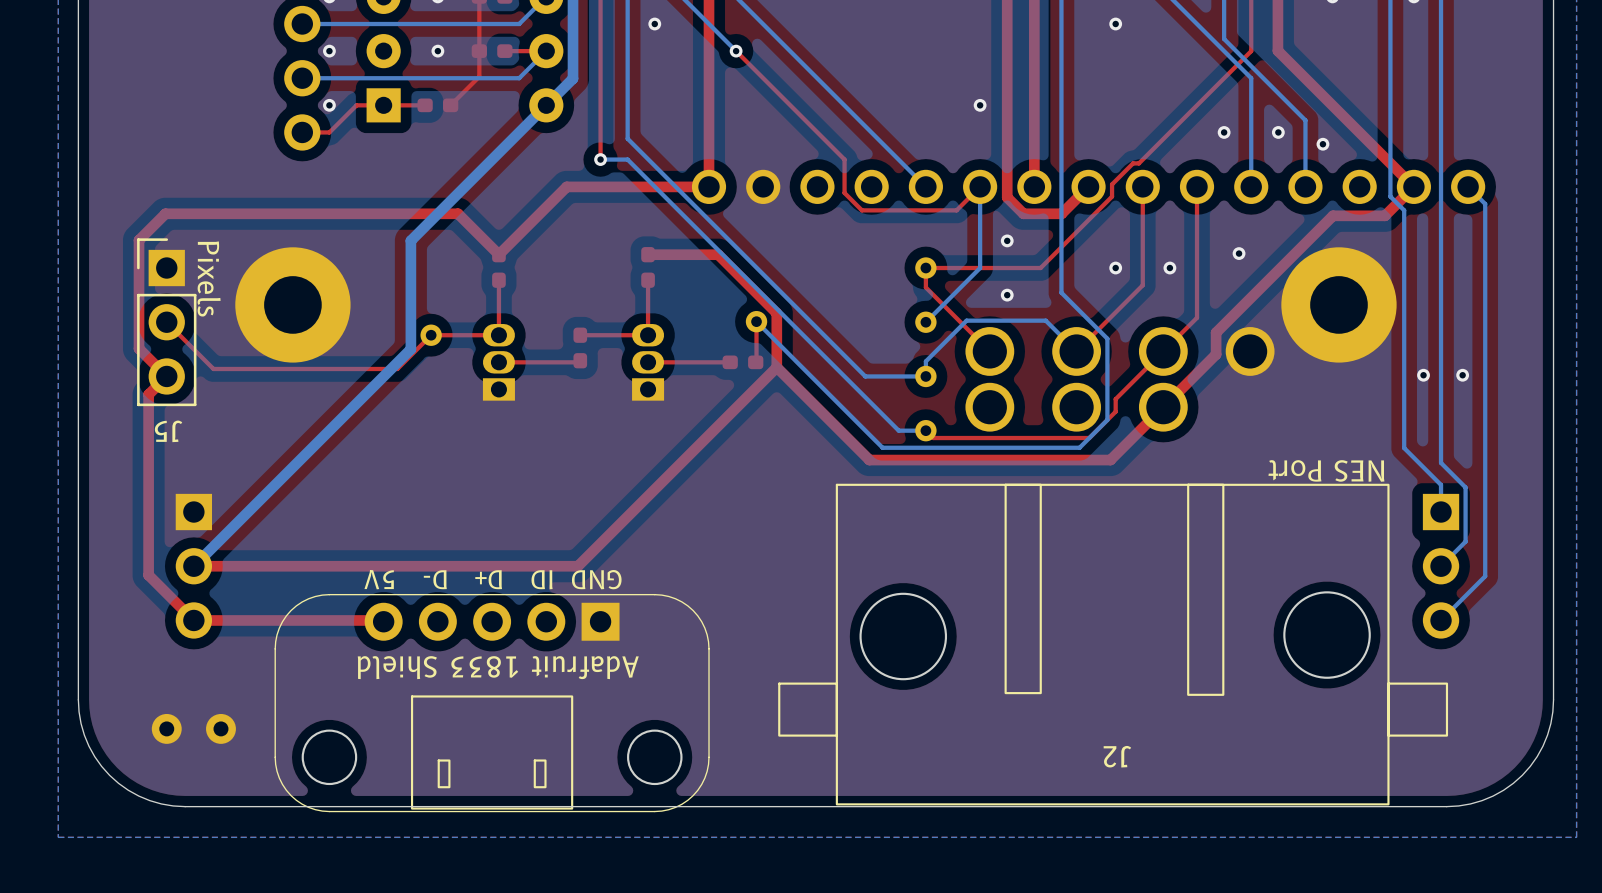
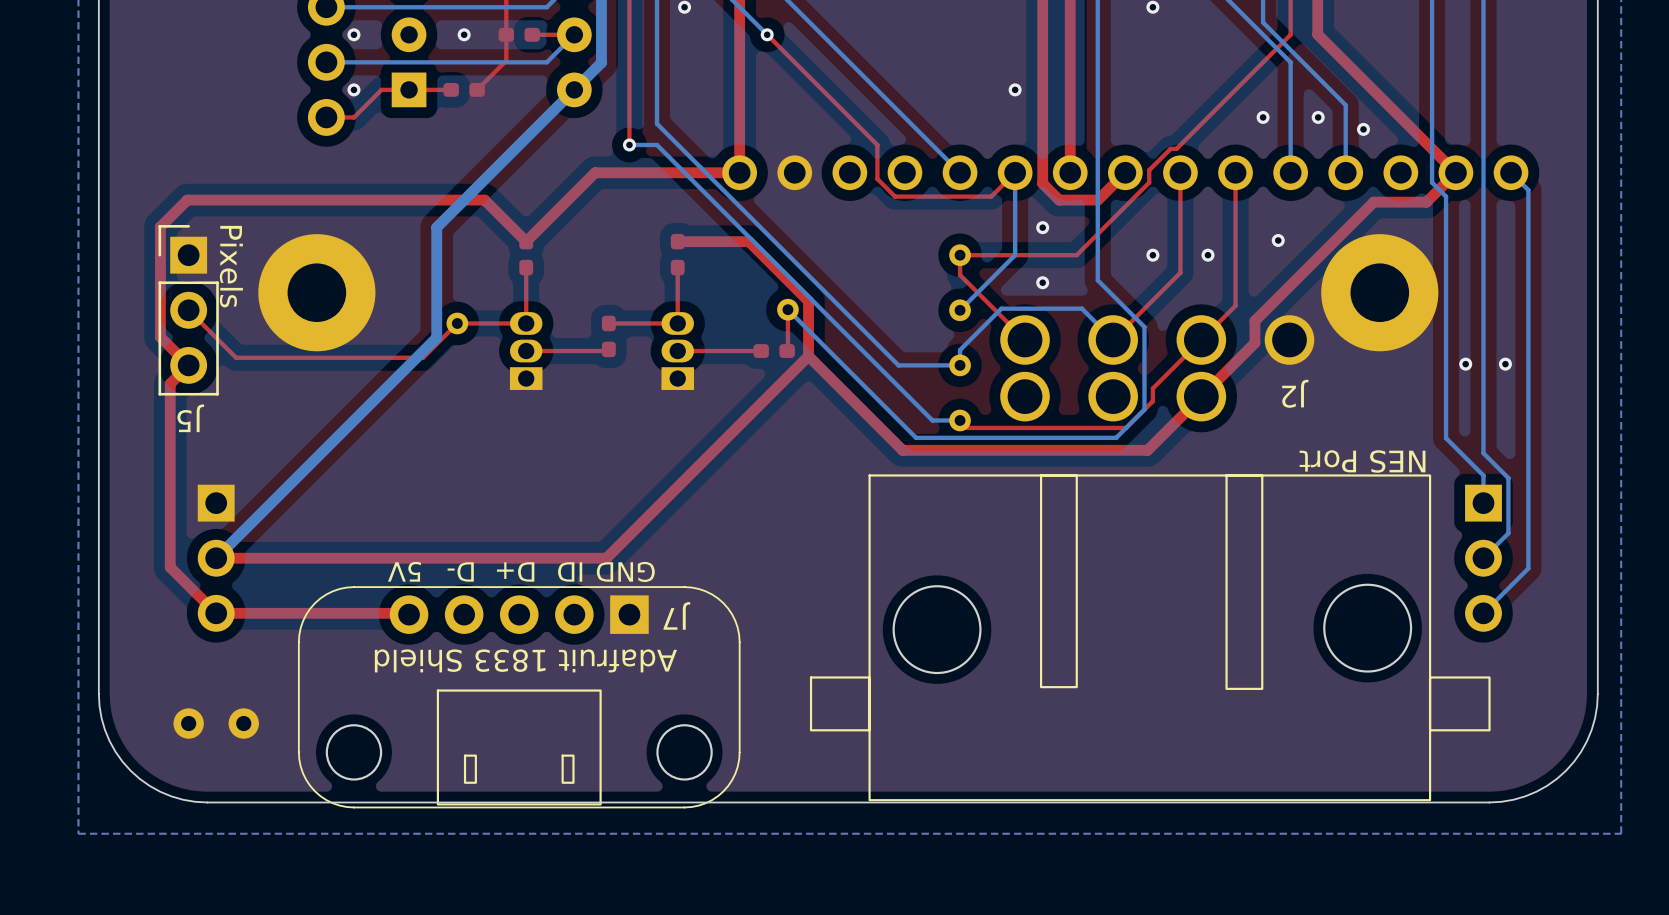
J7 name: none -> J7 (676, 615)
J2 name position: J2 (1117, 756) -> J2 (1295, 393)

